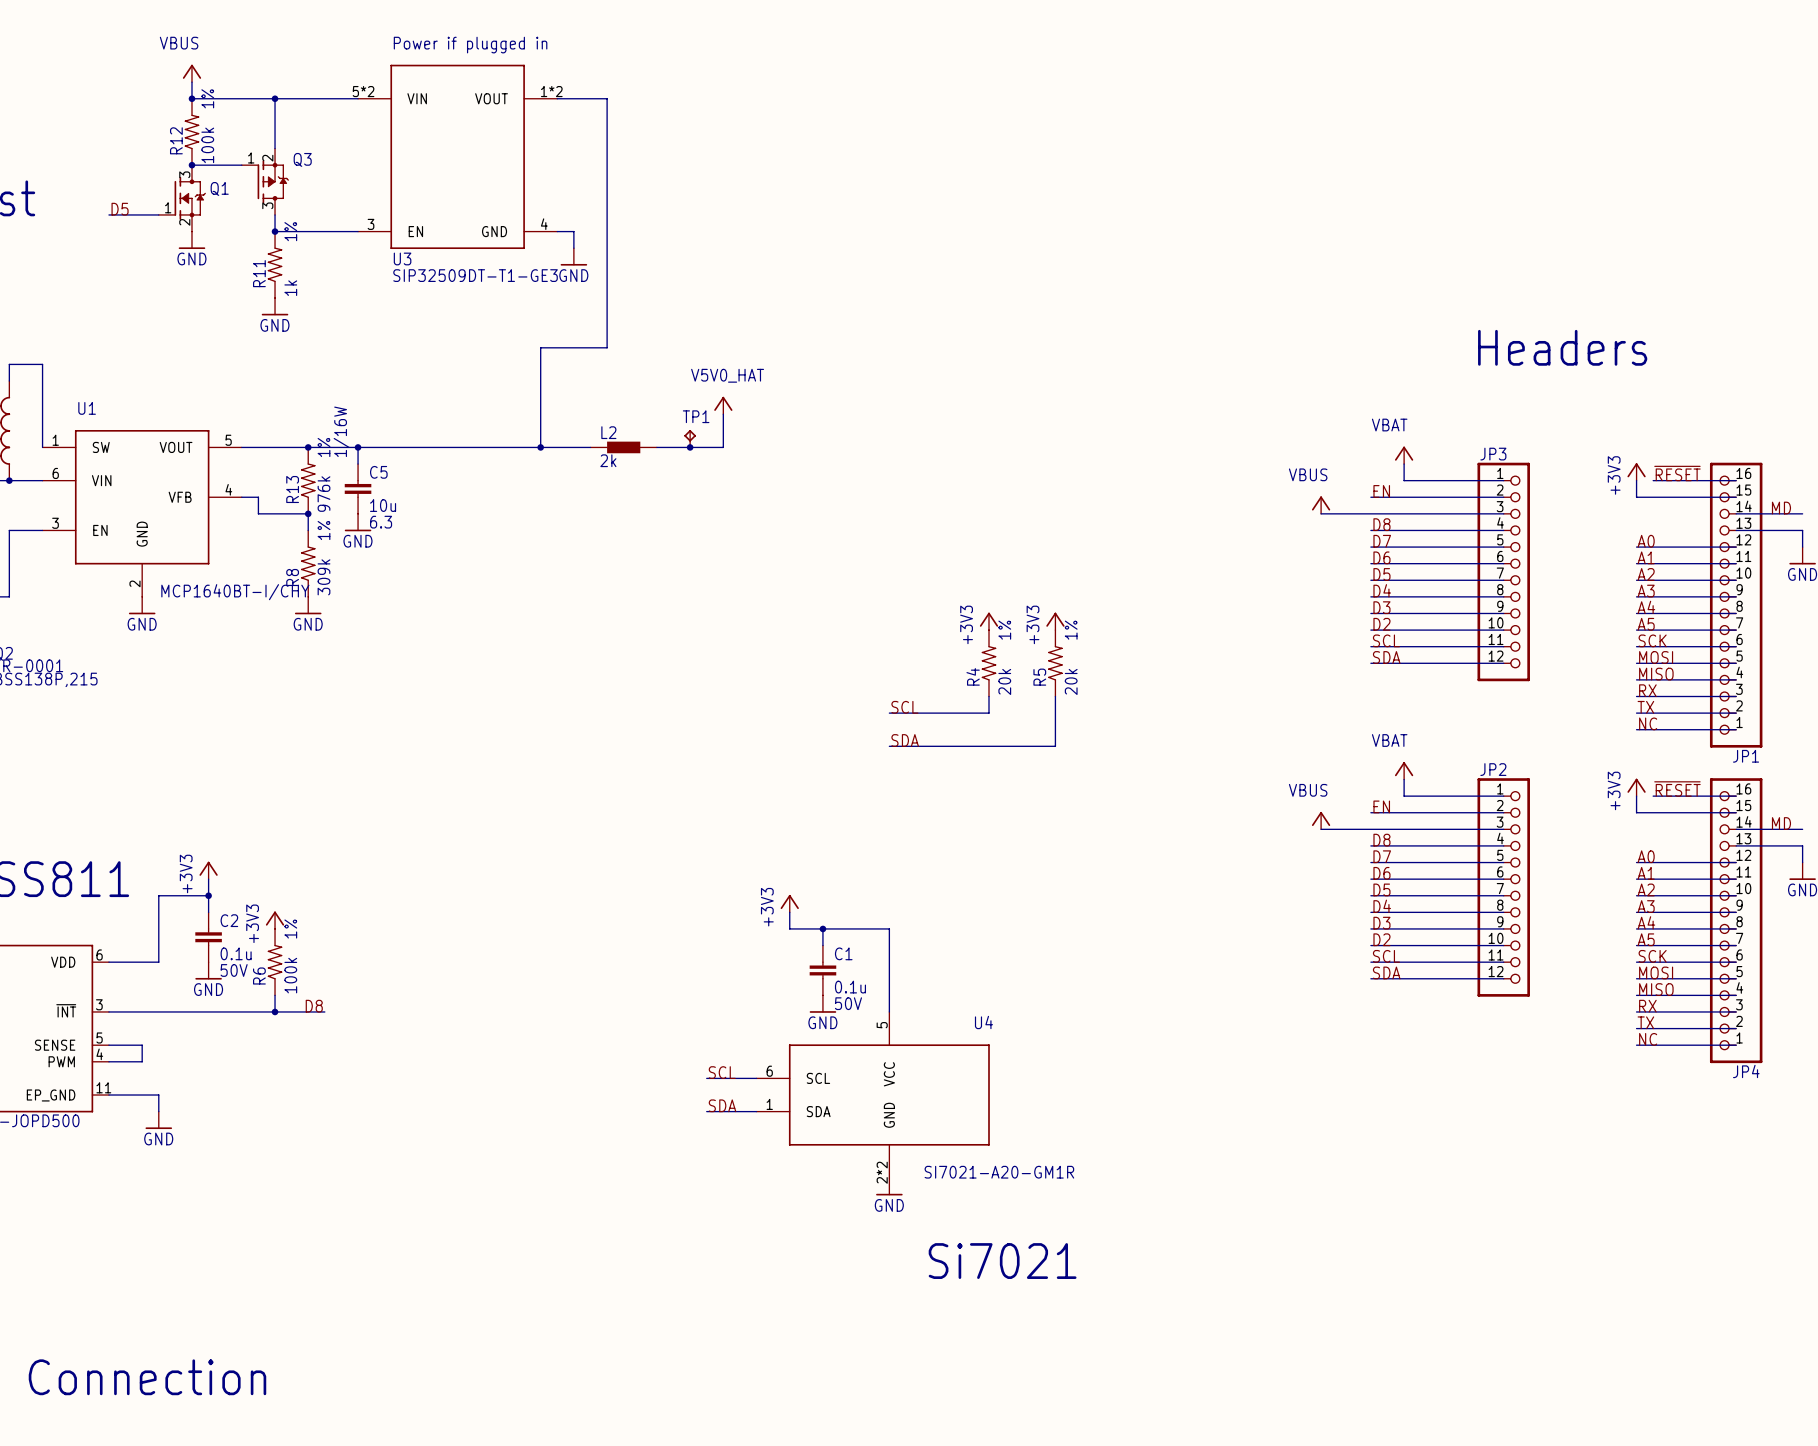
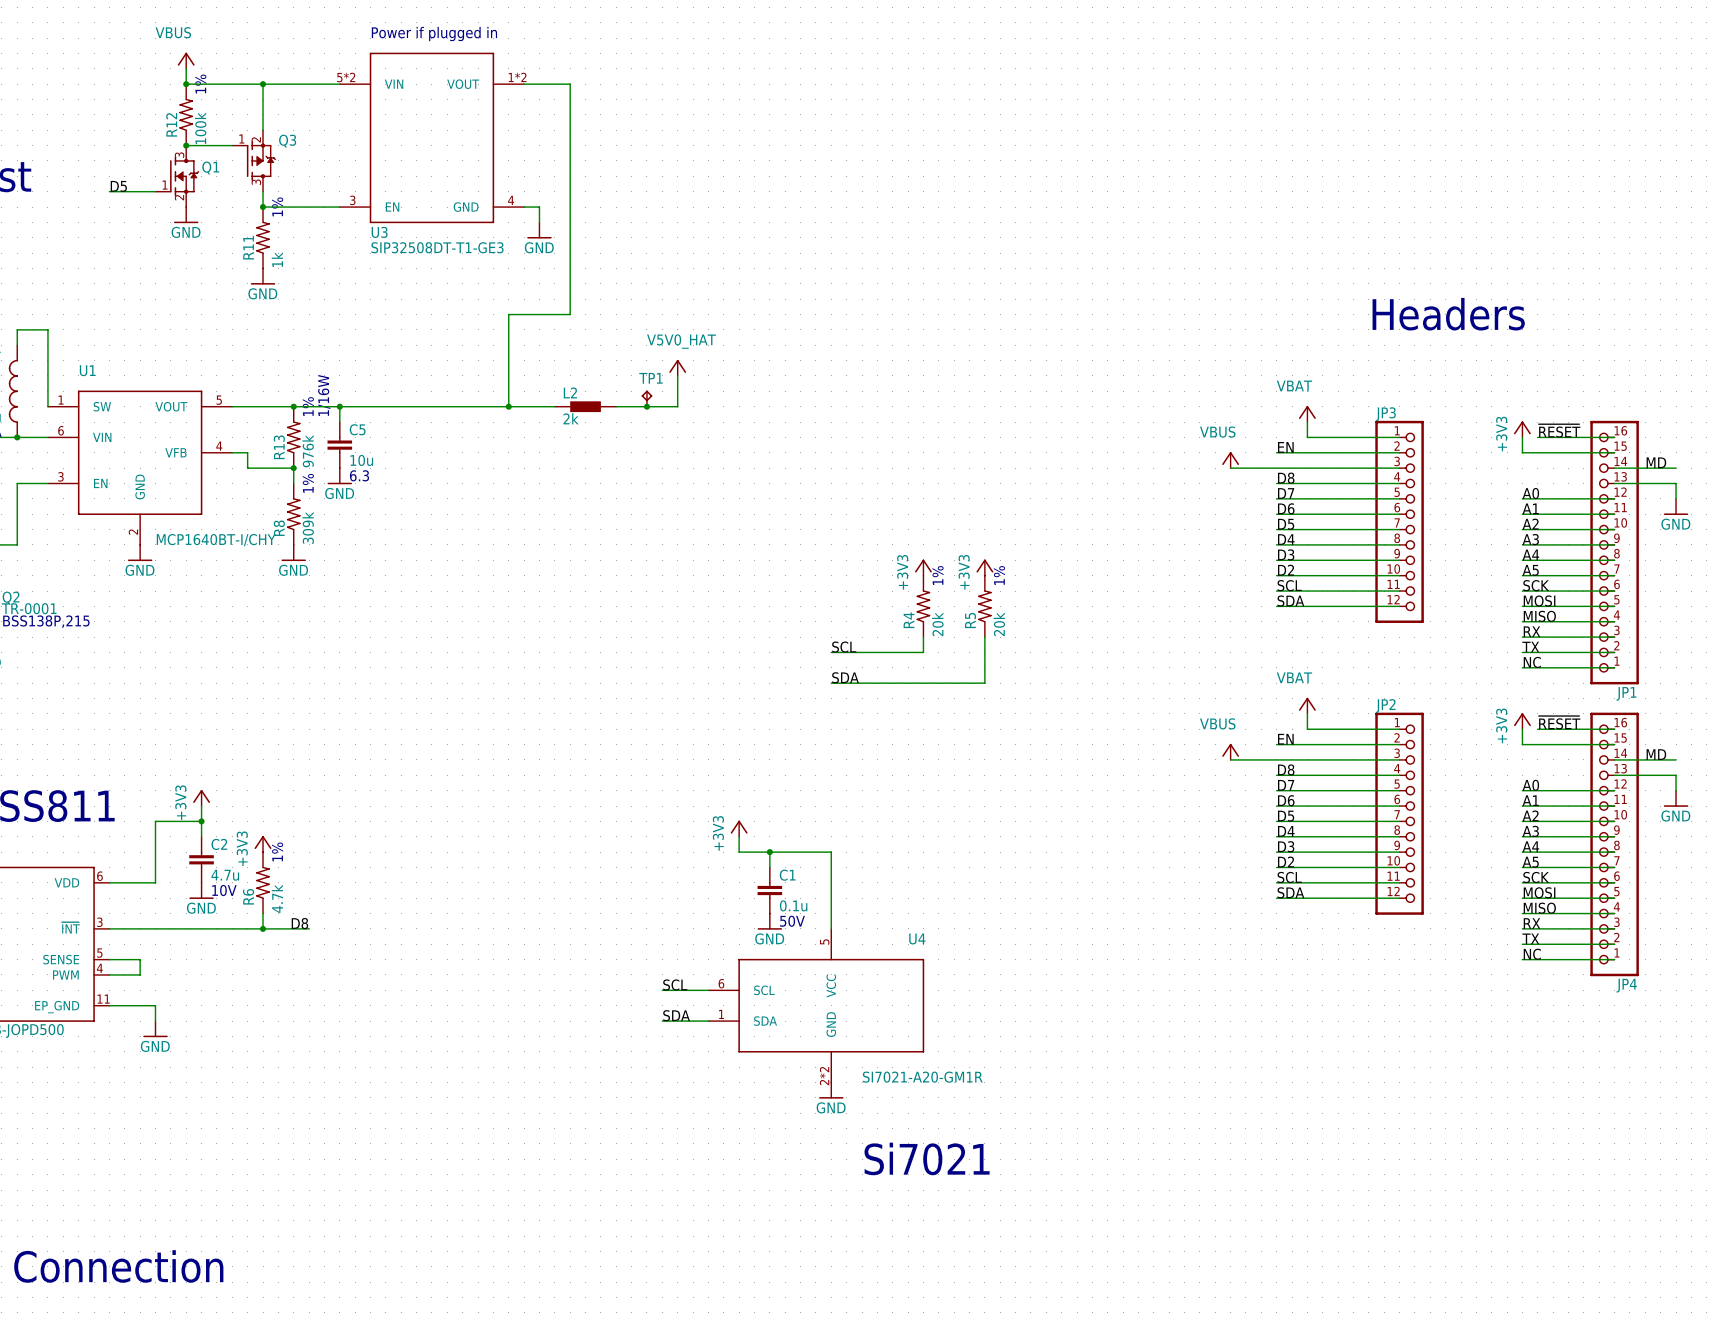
U3 text: SIP32509DT-T1-GE3 (475, 275) -> SIP32508DT-T1-GE3 (437, 247)
C2 value: 0.1u (236, 953) -> 4.7u (225, 875)
C2 text: 50V (234, 970) -> 10V (224, 890)
R6 value: 100k (290, 975) -> 4.7k (277, 898)

